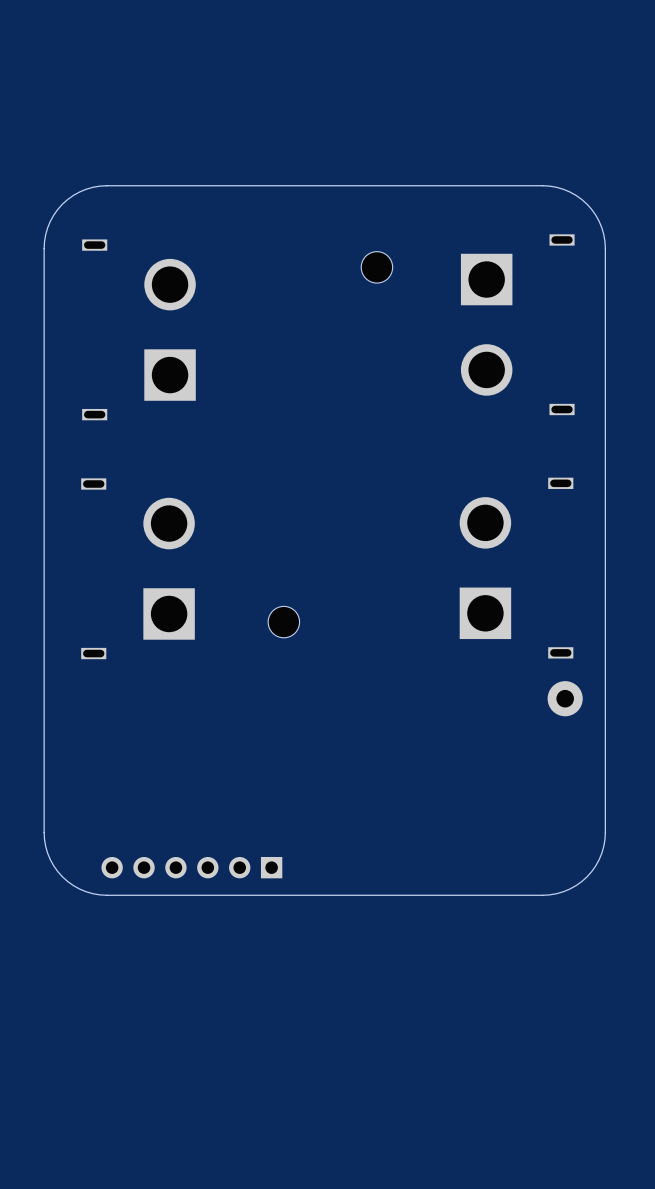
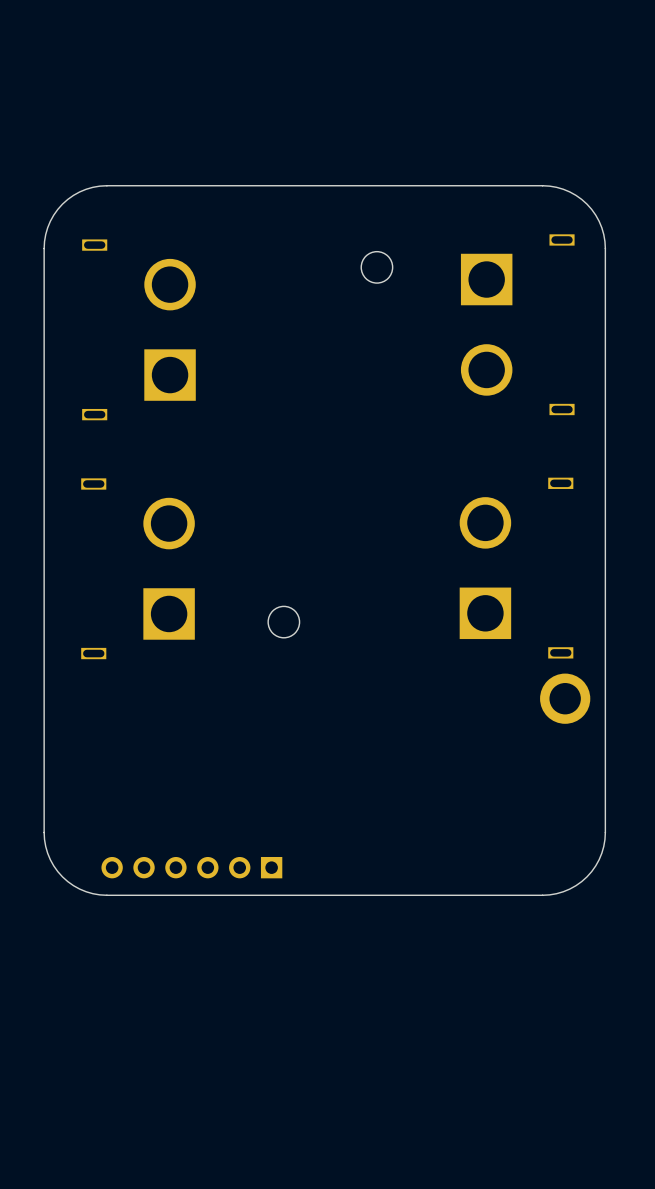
part footprint: [547, 681, 583, 717] -> [540, 673, 591, 724]

